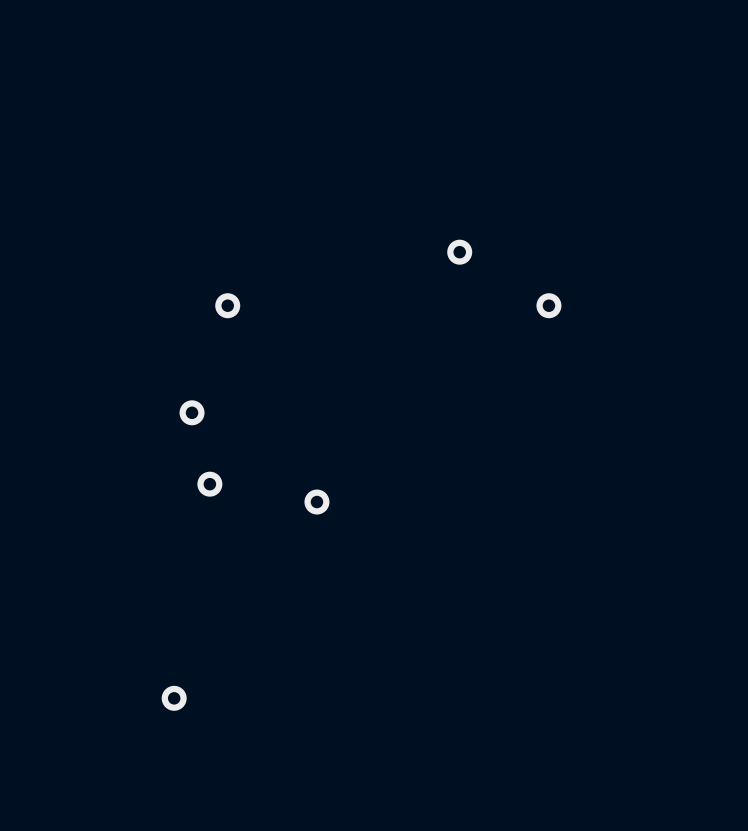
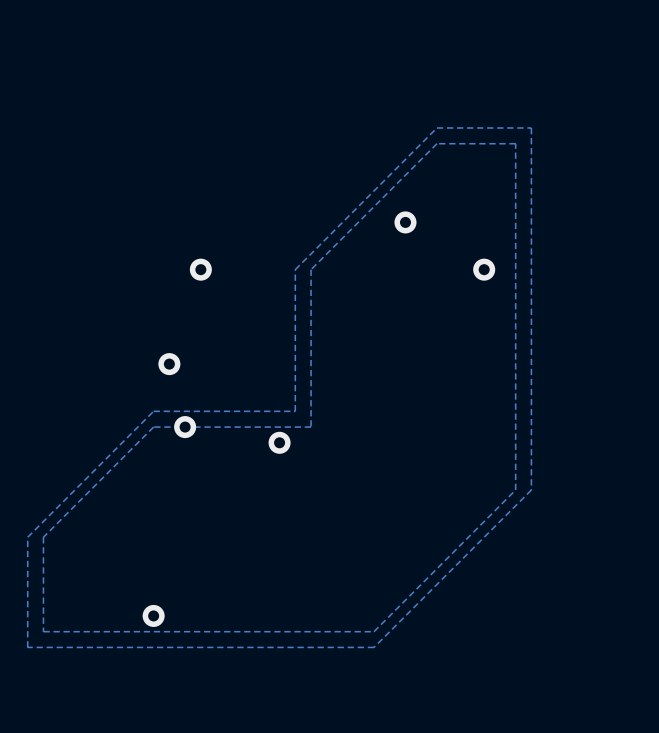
zone outline: none -> (531, 127) (436, 127) (295, 269) (295, 411) (153, 411) (27, 537) (27, 647) (374, 647) (531, 490) (531, 127)
zone outline: none -> (515, 143) (515, 490) (374, 631) (43, 631) (43, 537) (153, 427) (311, 427) (311, 269) (436, 143) (515, 143)

